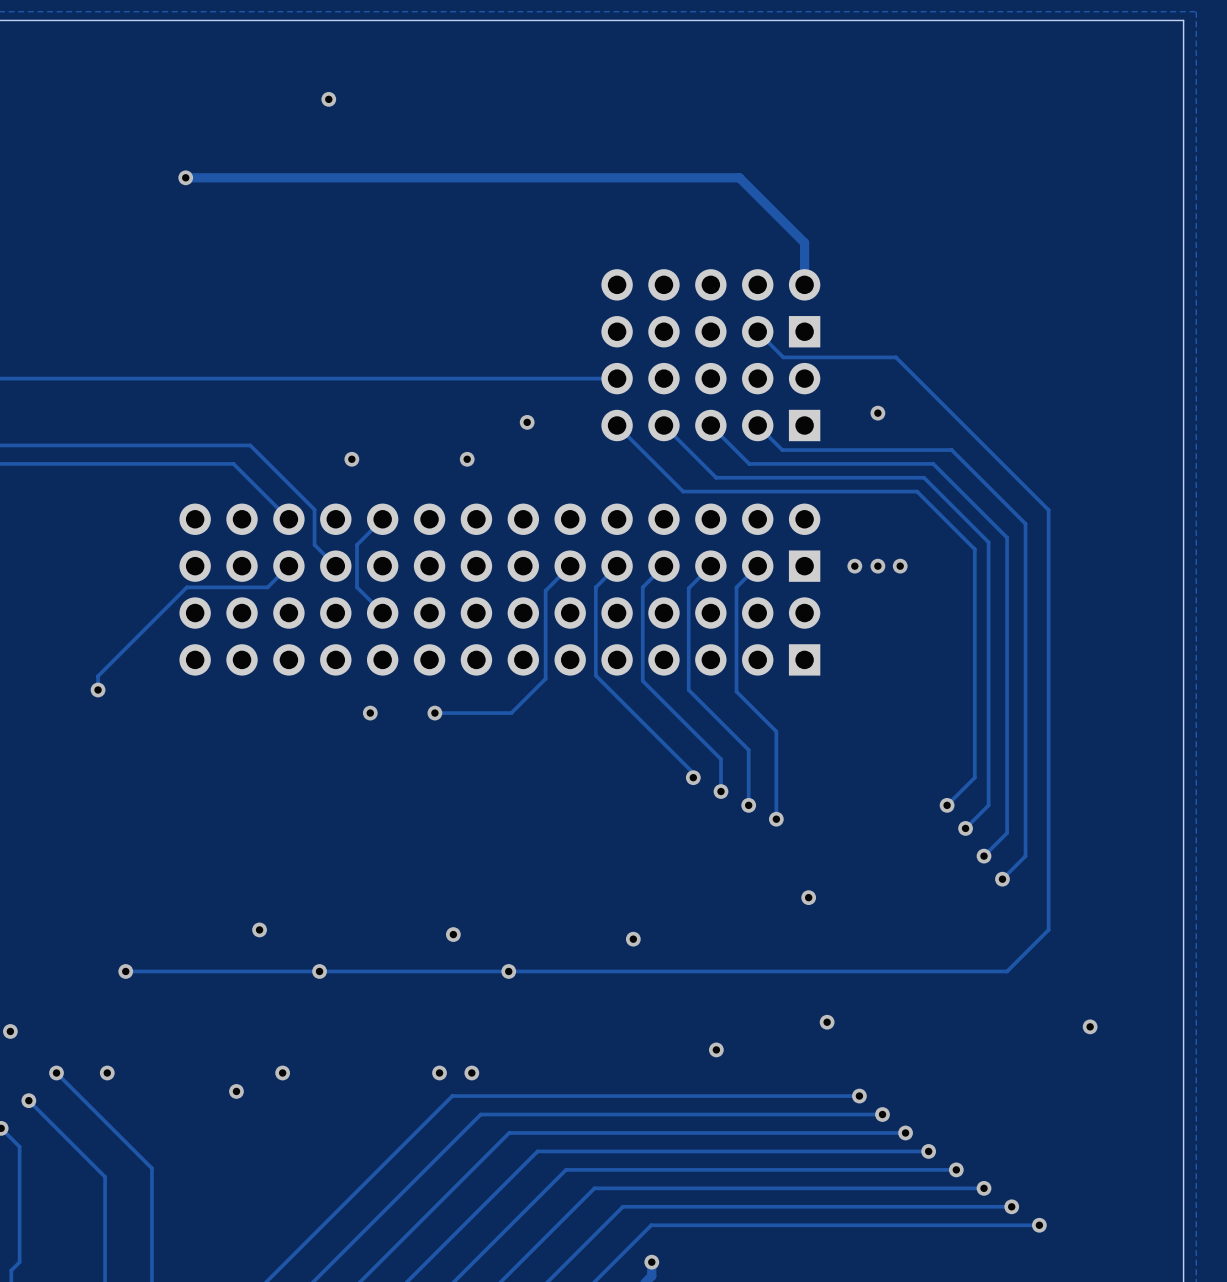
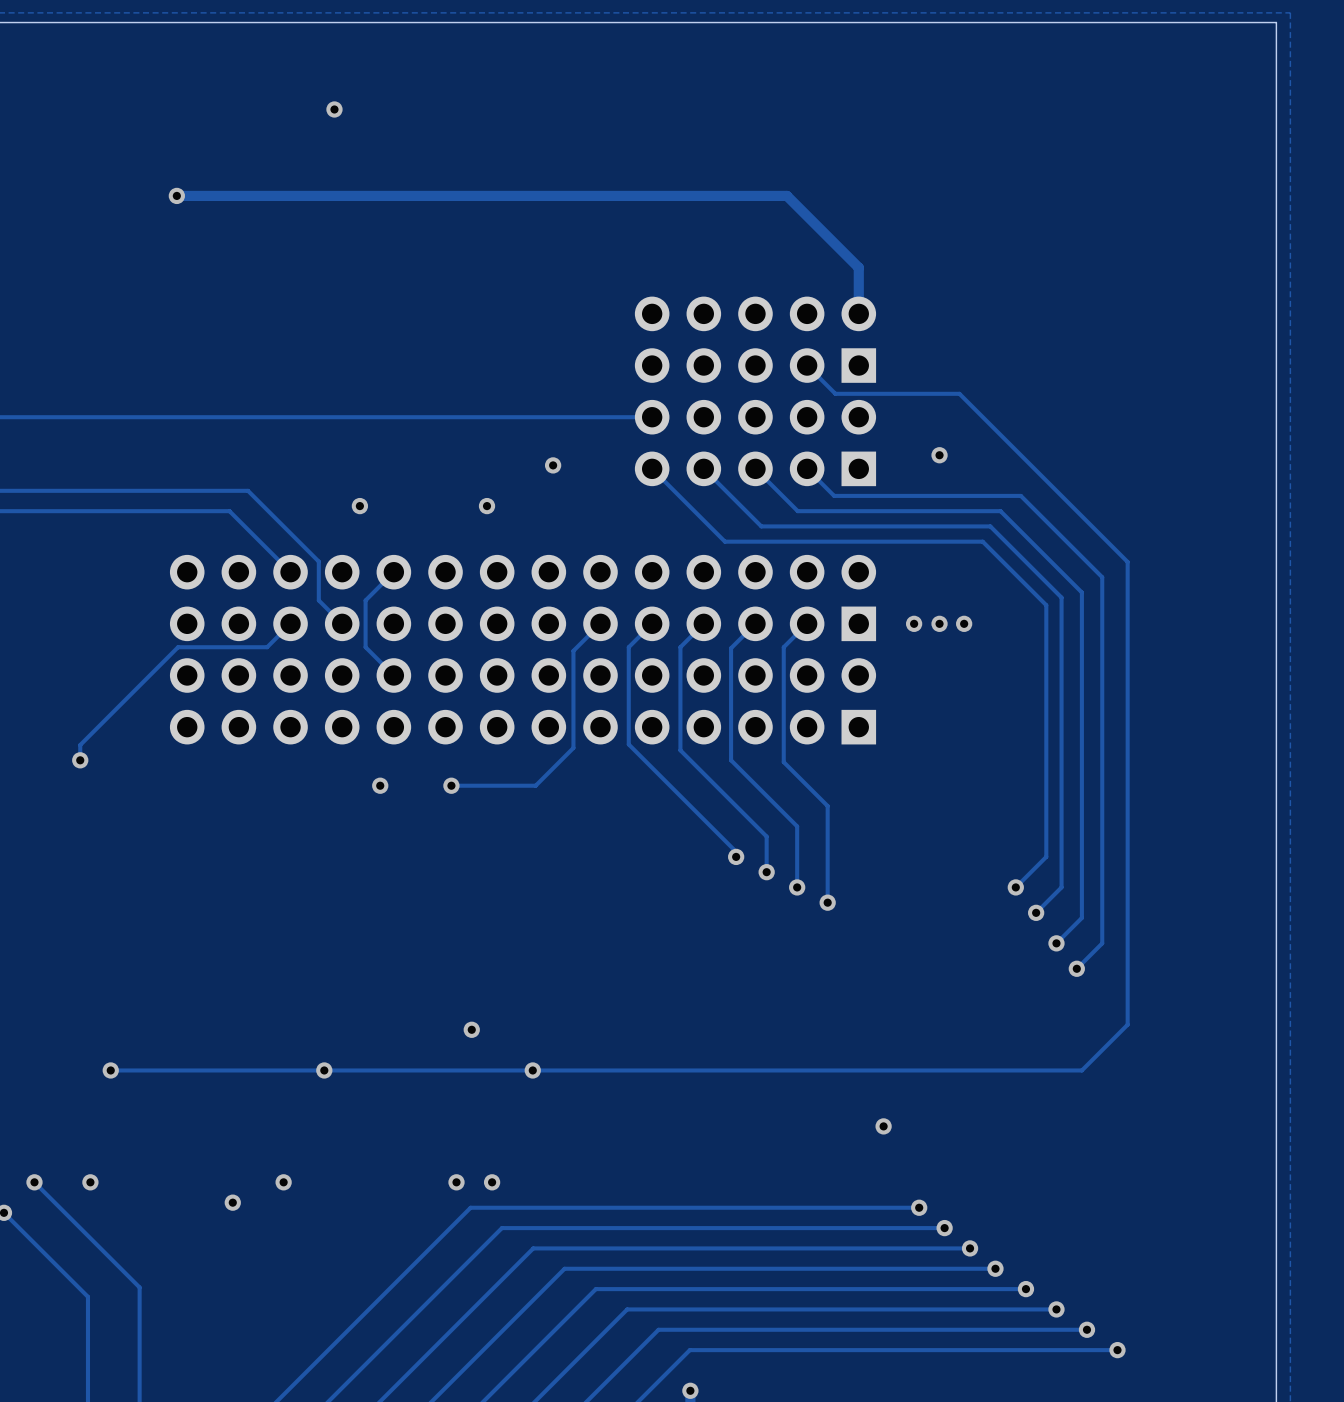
via: (808, 897) -> none
via: (259, 929) -> none
via: (633, 939) -> none
via: (1090, 1026) -> none
via: (716, 1049) -> none

